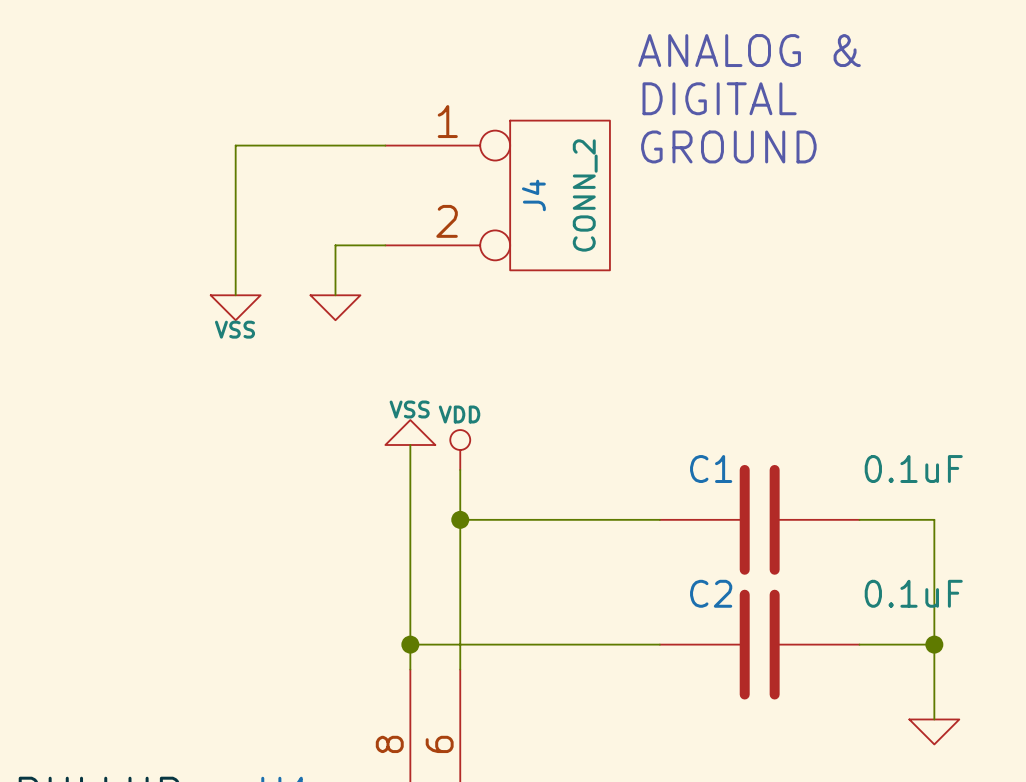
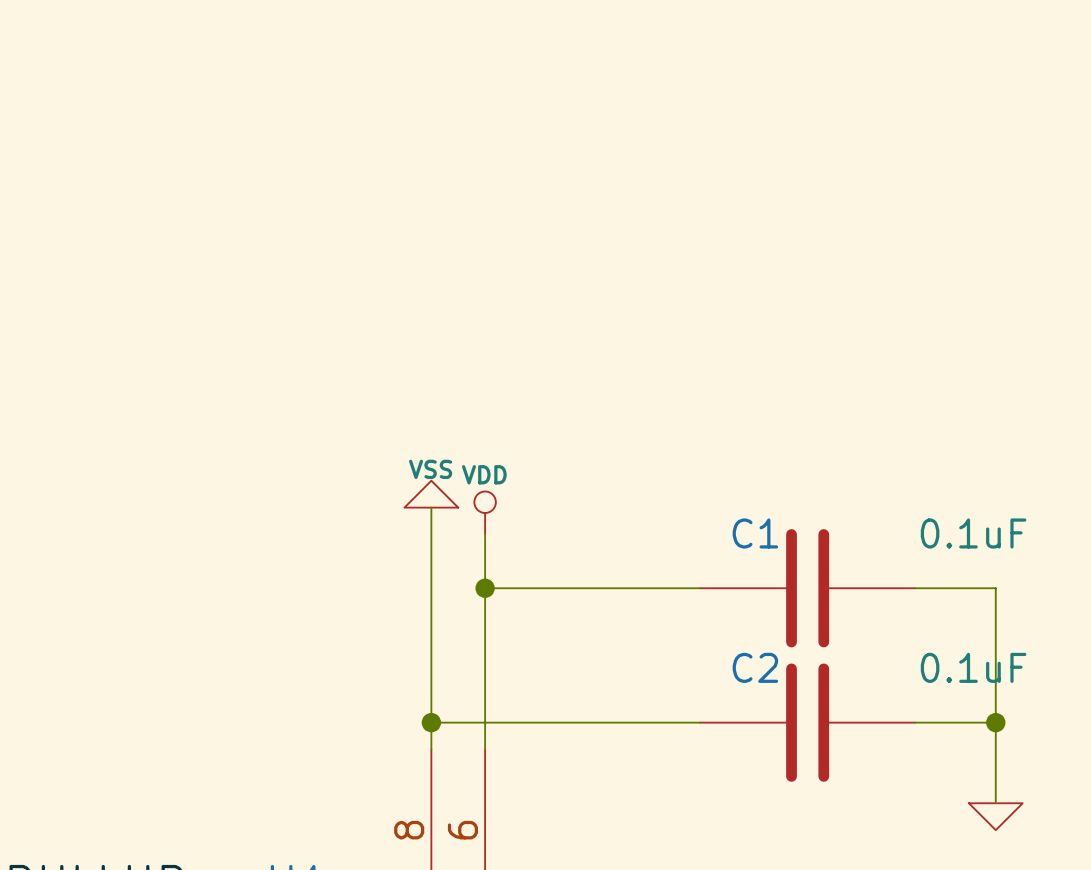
text: ANALOG & (749, 50) -> none
text: DIGITAL (719, 98) -> none
wire: (385, 145) (235, 145) (235, 295) -> none
text: GROUND (728, 146) -> none
J4: CONN_2 (497, 195) -> none
wire: (385, 245) (335, 245) (335, 295) -> none
power symbol: VSS (235, 307) -> none
power symbol: (335, 307) -> none

